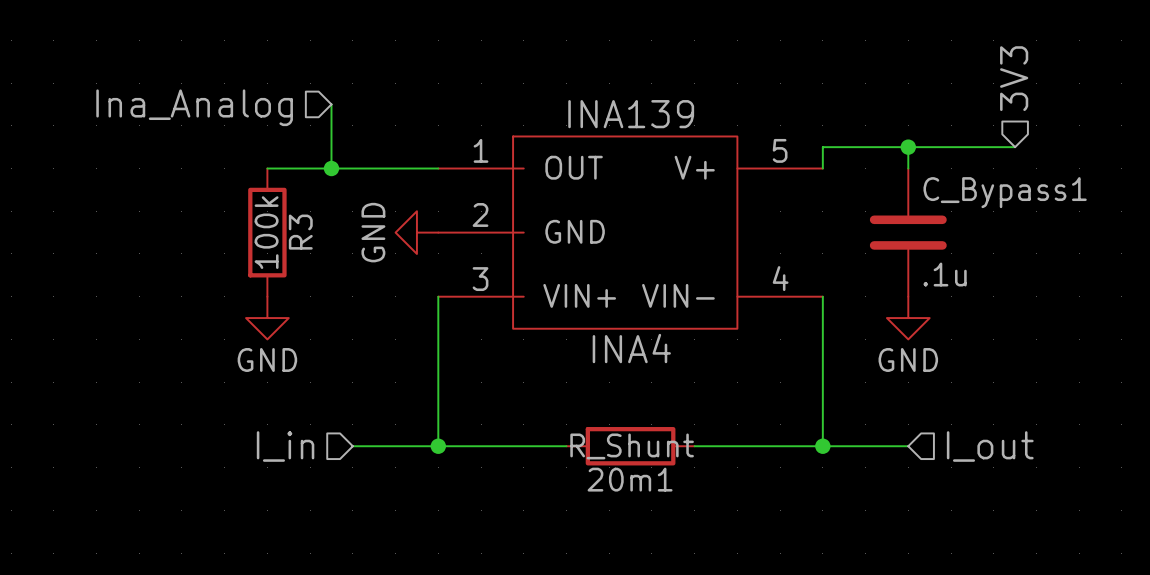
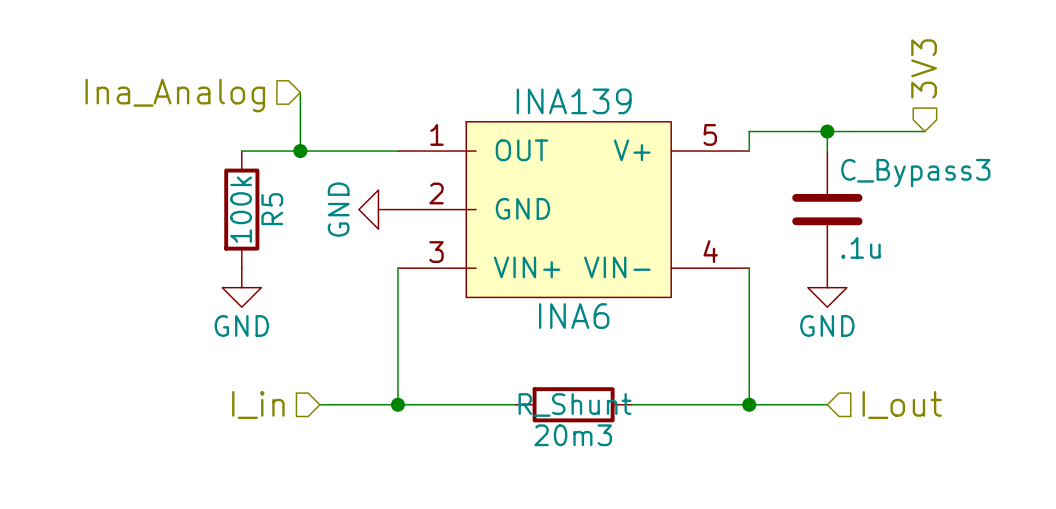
C_Bypass1 name: C_Bypass1 (1005, 192) -> C_Bypass3 (915, 173)
R3 name: R3 (300, 232) -> R5 (272, 209)
INA4 name: INA4 (631, 348) -> INA6 (574, 316)
20m1 name: 20m1 (630, 479) -> 20m3 (573, 435)

